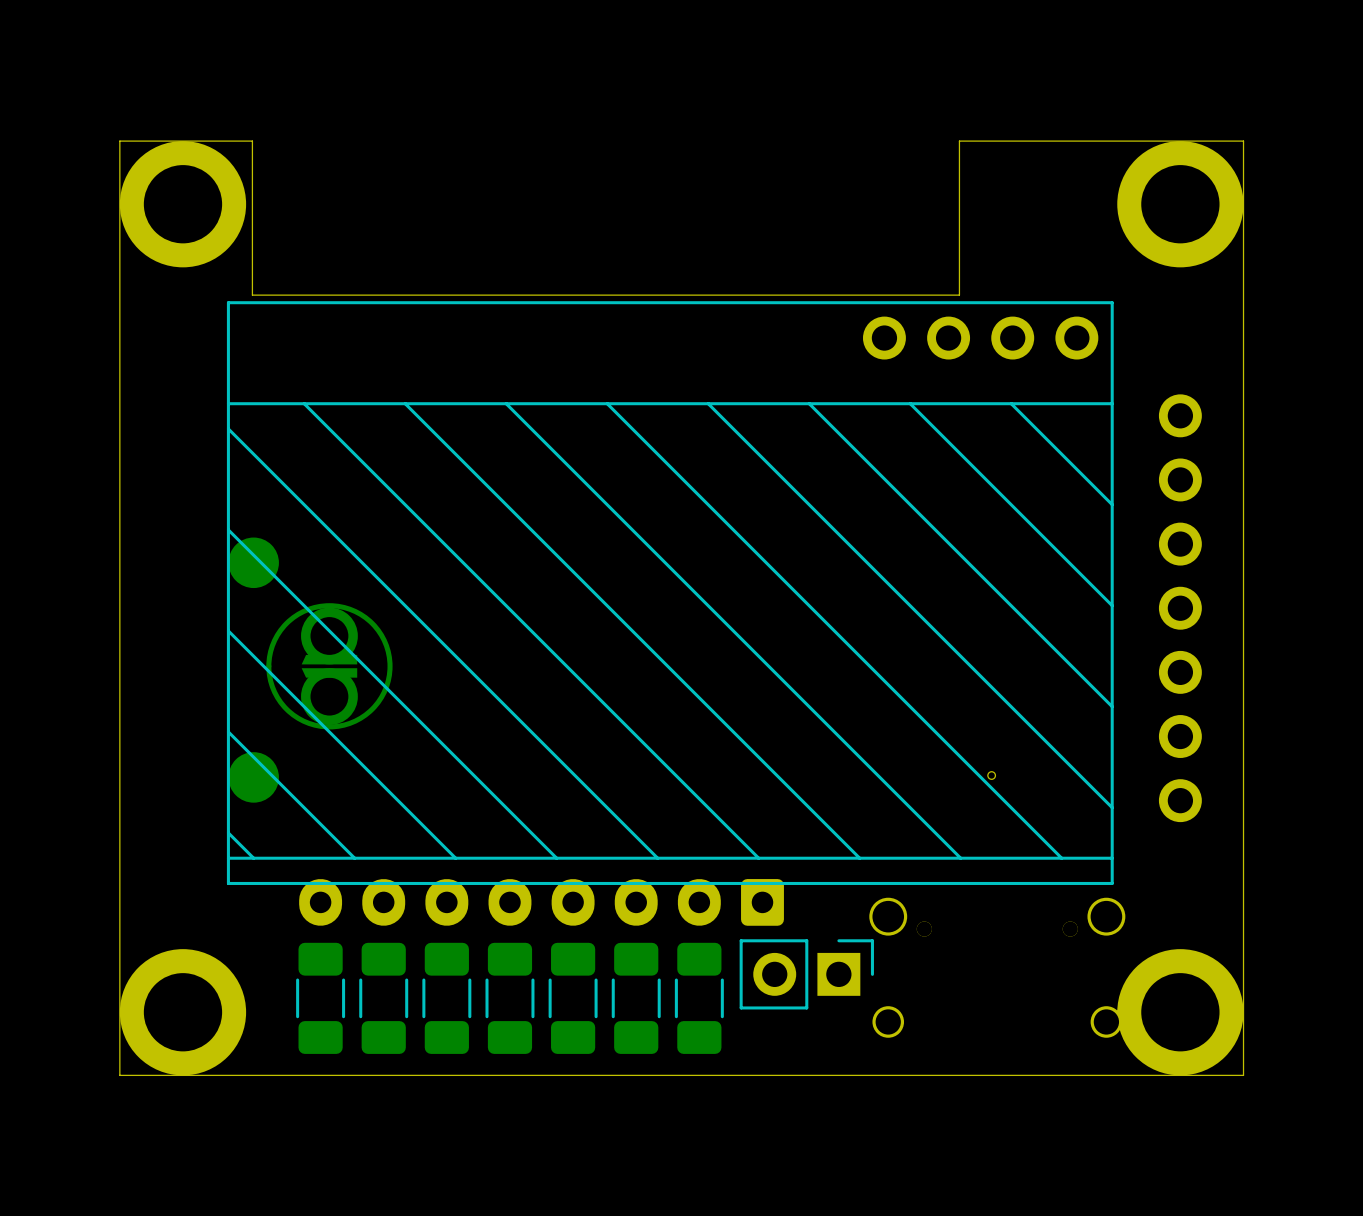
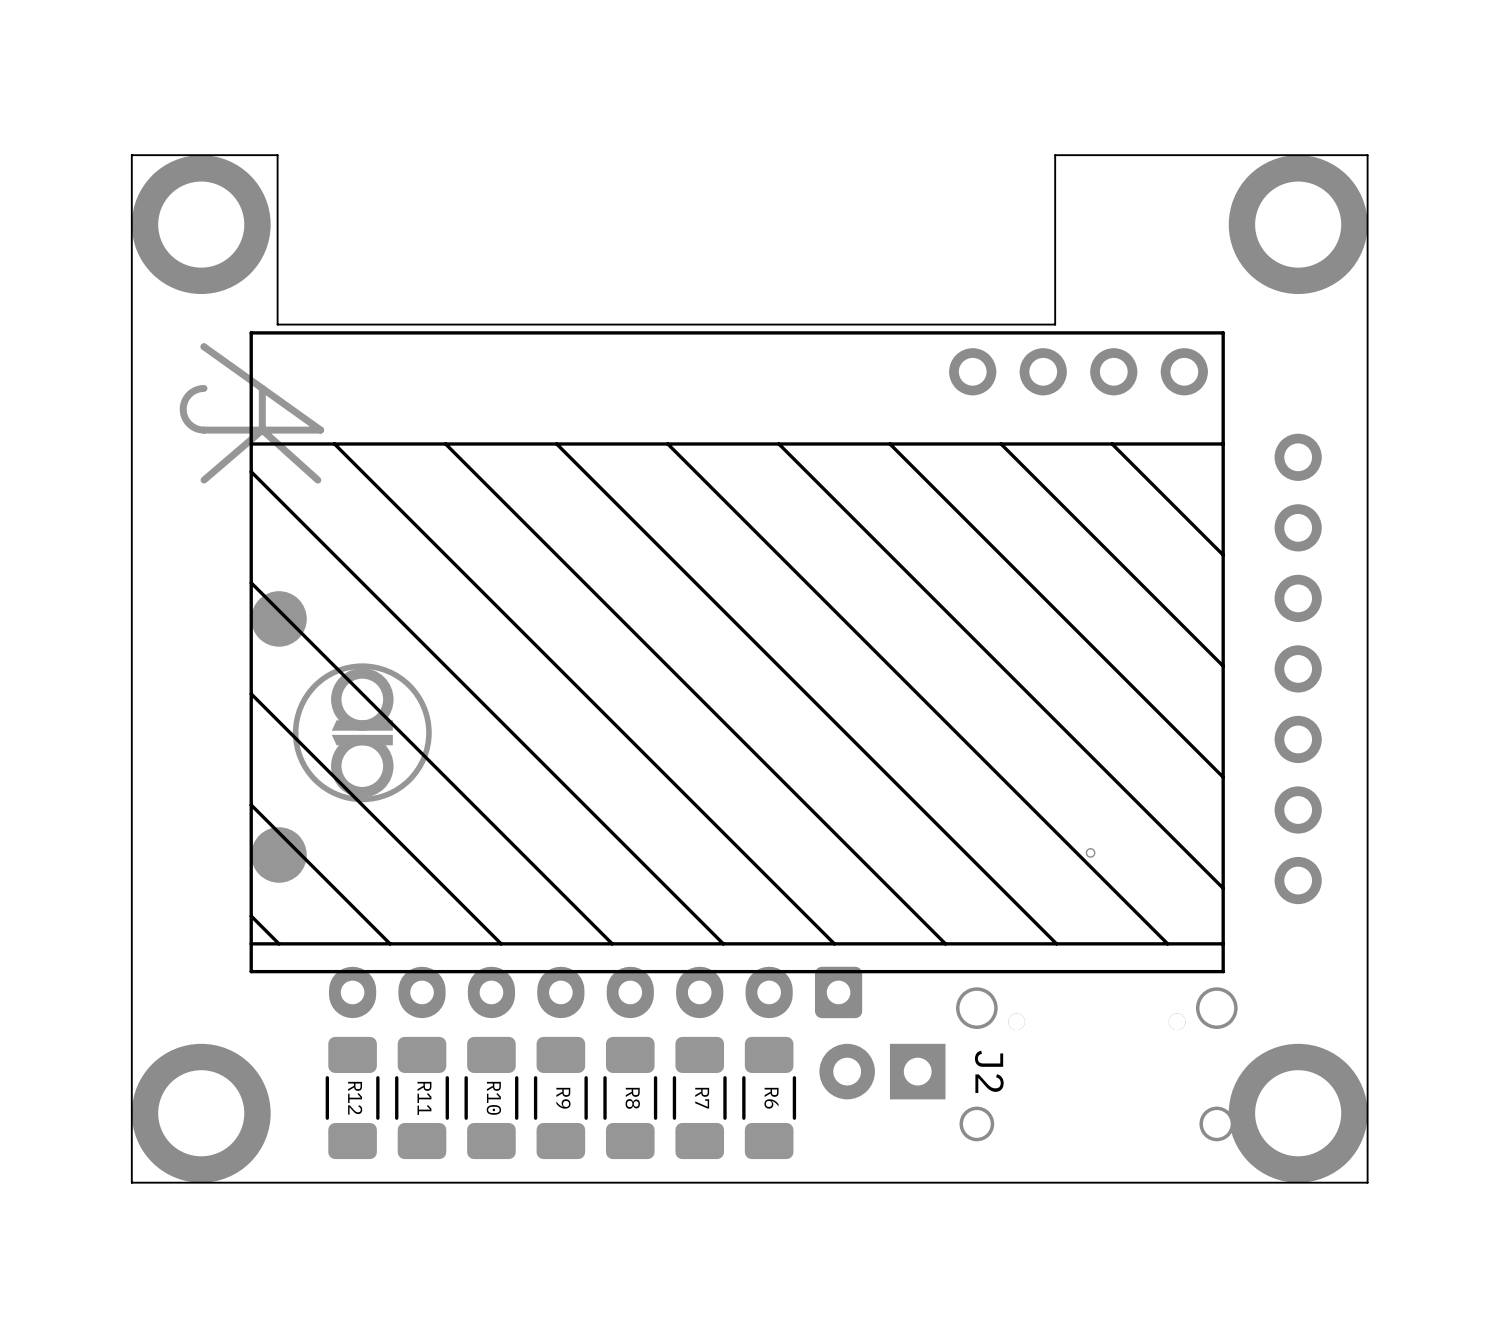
part: none -> (251, 413)
J2: none -> (882, 1071)
part: (806, 974) -> none
R12 name: none -> R12 (355, 1098)
R11 name: none -> R11 (424, 1098)
R10 name: none -> R10 (493, 1098)
R9 name: none -> R9 (563, 1098)
R8 name: none -> R8 (632, 1098)
R7 name: none -> R7 (702, 1098)
R6 name: none -> R6 (771, 1098)

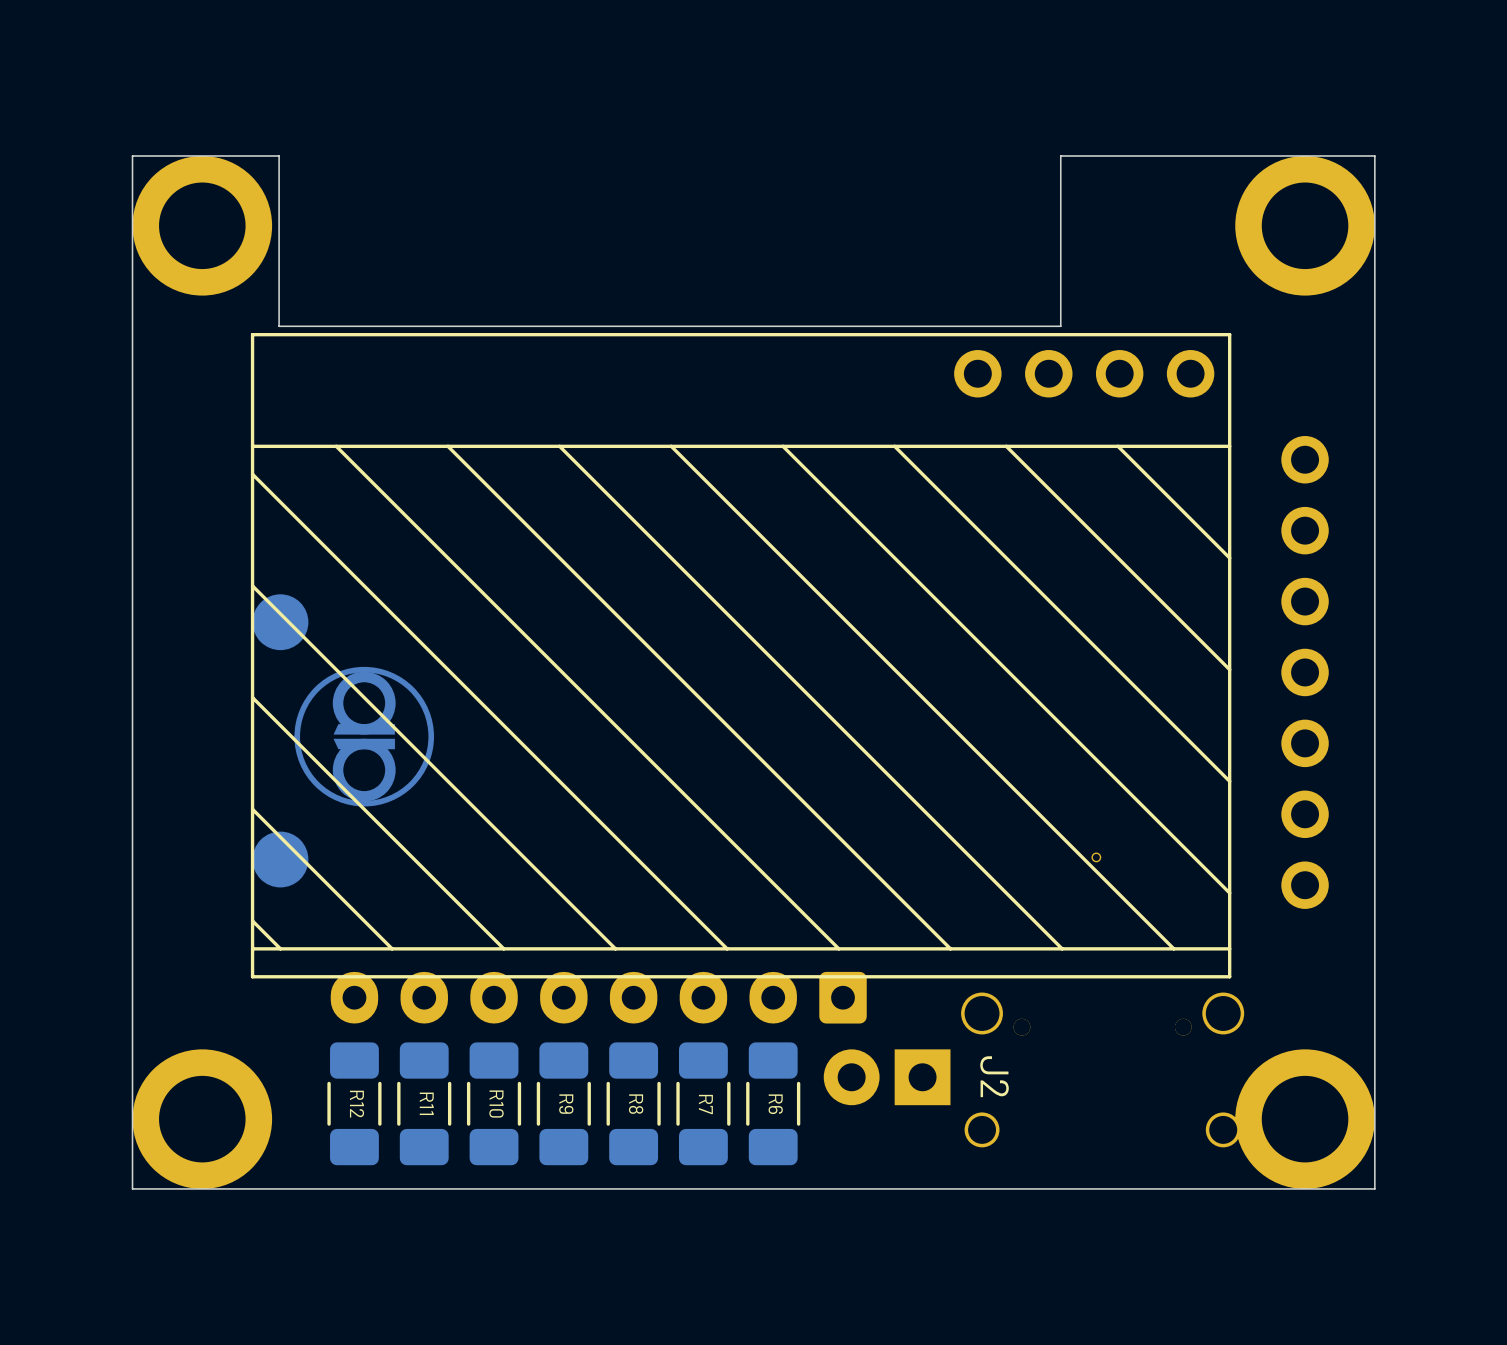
part: (251, 413) -> none

